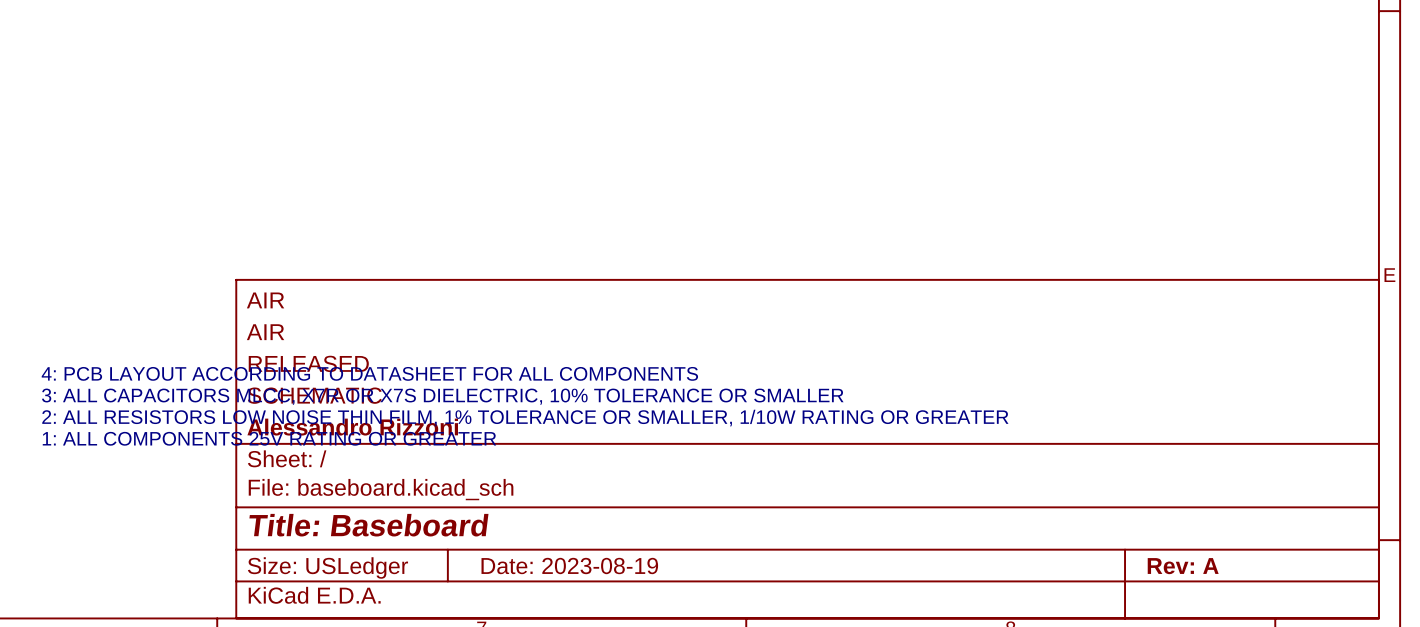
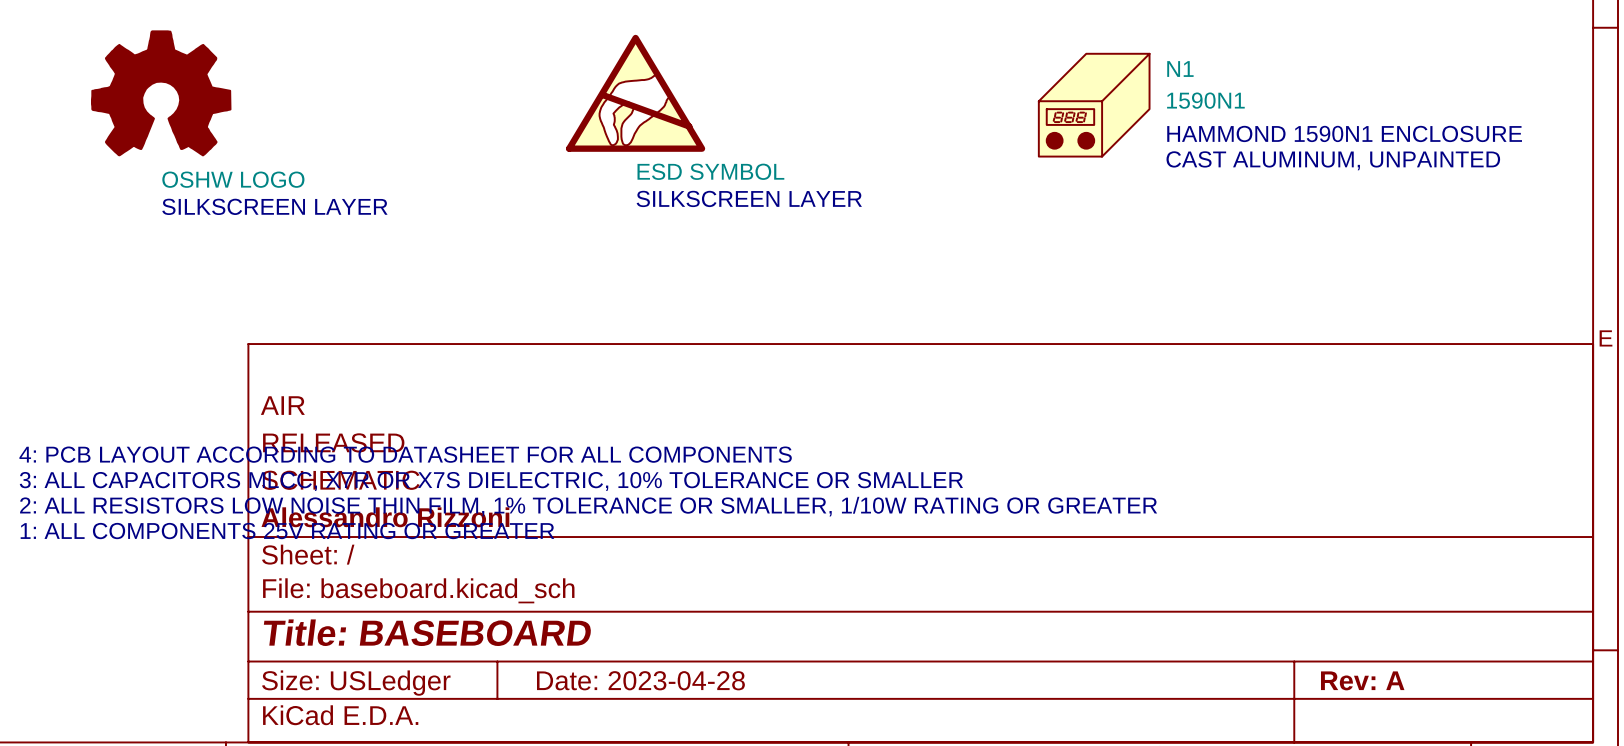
part: none -> OSHW LOGO (161, 93)
part: none -> ESD SYMBOL (635, 93)
N1: none -> 1590N1 (1094, 105)
text: none -> HAMMOND 1590N1 ENCLOSURE (1344, 133)
text: none -> CAST ALUMINUM, UNPAINTED (1333, 160)
text: none -> SILKSCREEN LAYER (749, 198)
text: none -> SILKSCREEN LAYER (274, 206)
title block: AIR (265, 300) -> none
title block: Title: Baseboard (368, 525) -> Title: BASEBOARD (427, 632)
title block: Date: 2023-08-19 (569, 566) -> Date: 2023-04-28 (640, 680)

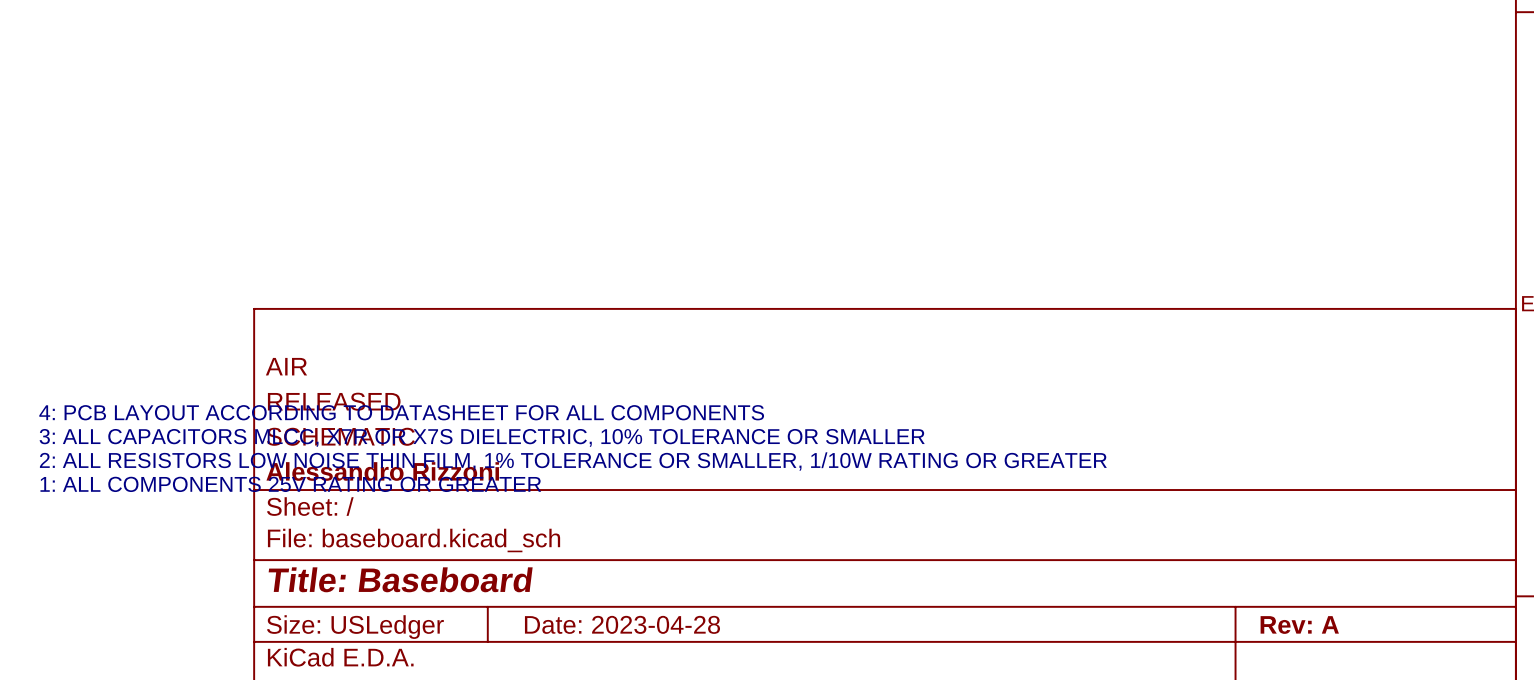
part: OSHW LOGO (161, 93) -> none
part: ESD SYMBOL (635, 93) -> none
N1: 1590N1 (1094, 105) -> none
text: HAMMOND 1590N1 ENCLOSURE (1344, 133) -> none
text: CAST ALUMINUM, UNPAINTED (1333, 160) -> none
text: SILKSCREEN LAYER (749, 198) -> none
text: SILKSCREEN LAYER (274, 206) -> none
title block: Title: BASEBOARD (427, 632) -> Title: Baseboard (400, 579)

